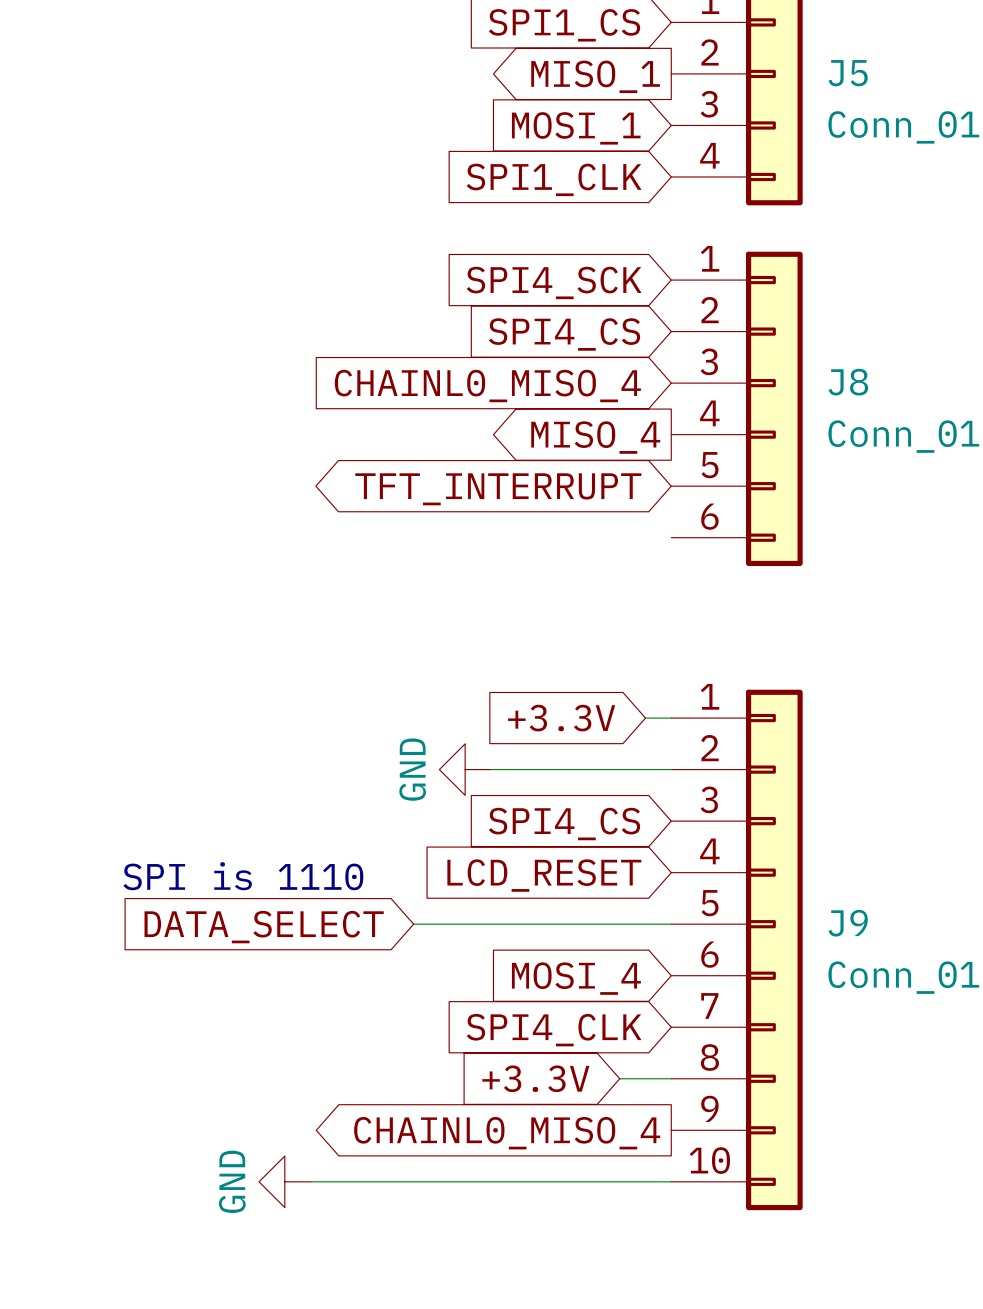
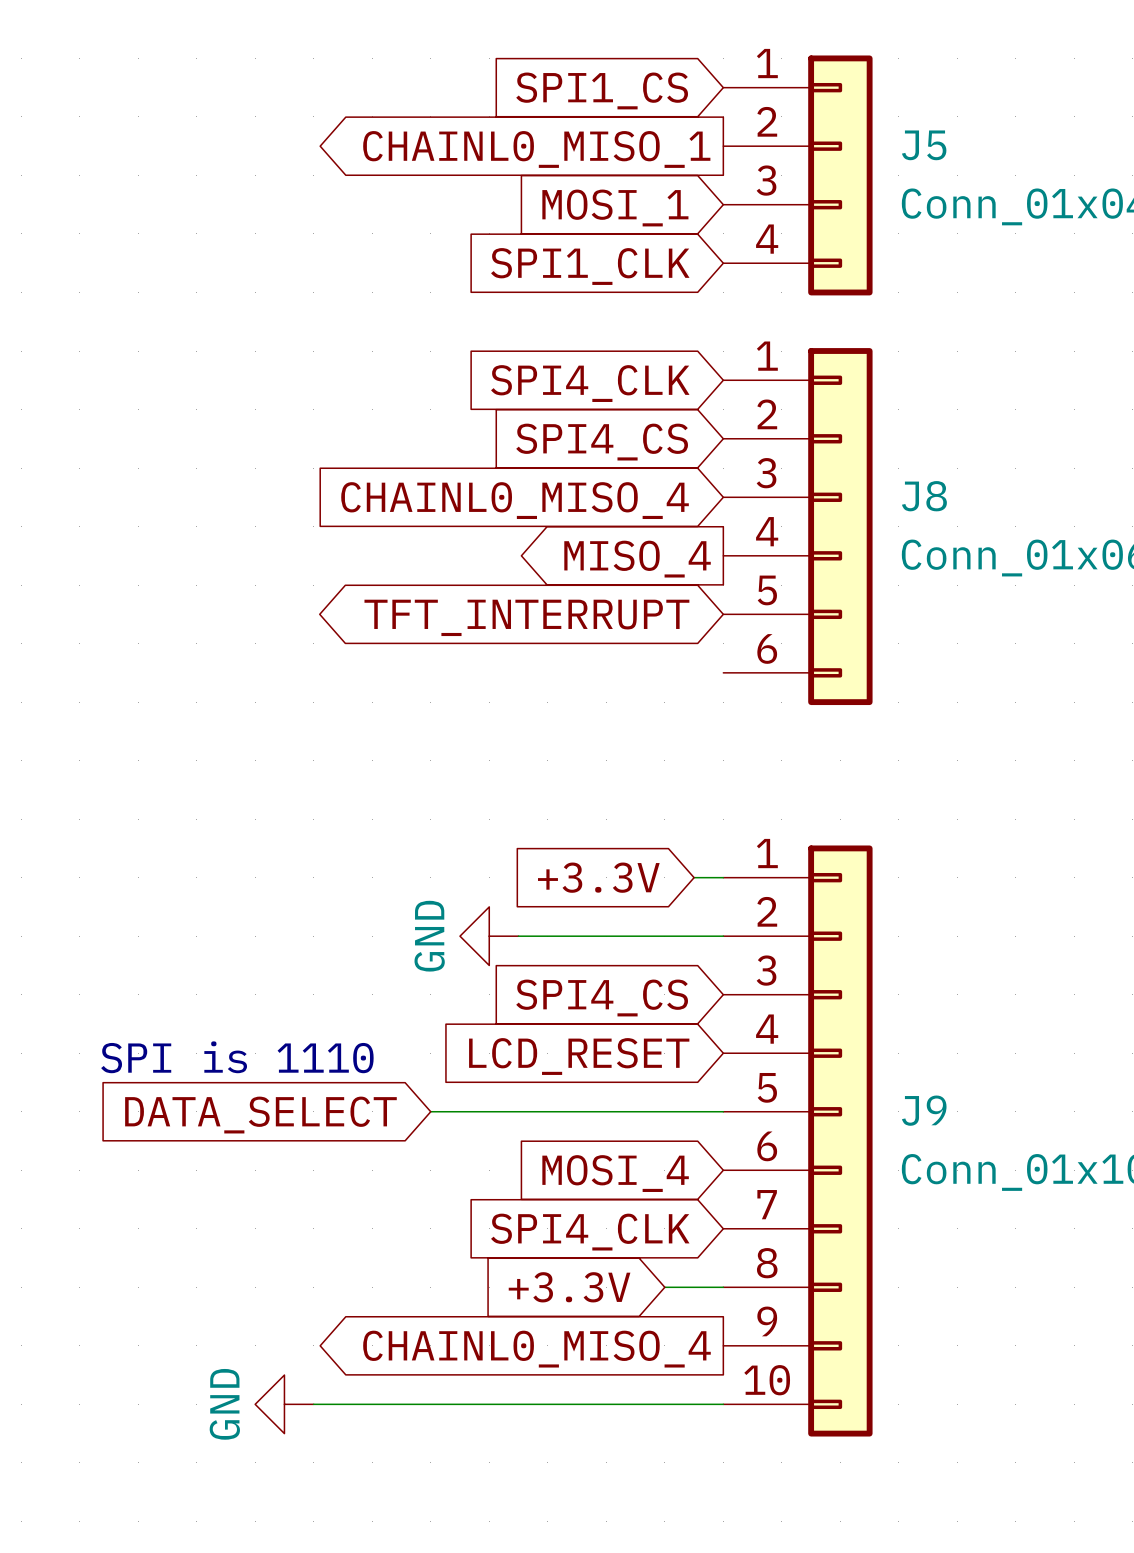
global label: MISO_1 (595, 76) -> CHAINL0_MISO_1 (536, 149)
global label: SPI4_SCK (554, 282) -> SPI4_CLK (590, 383)

